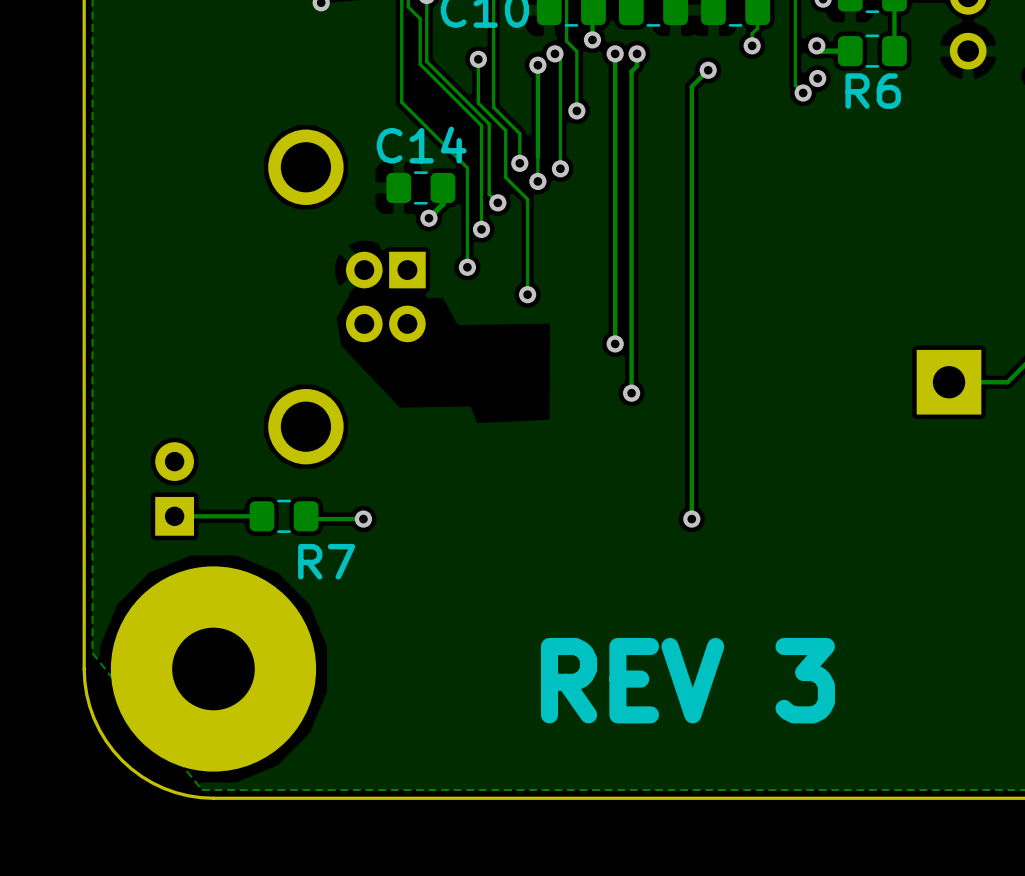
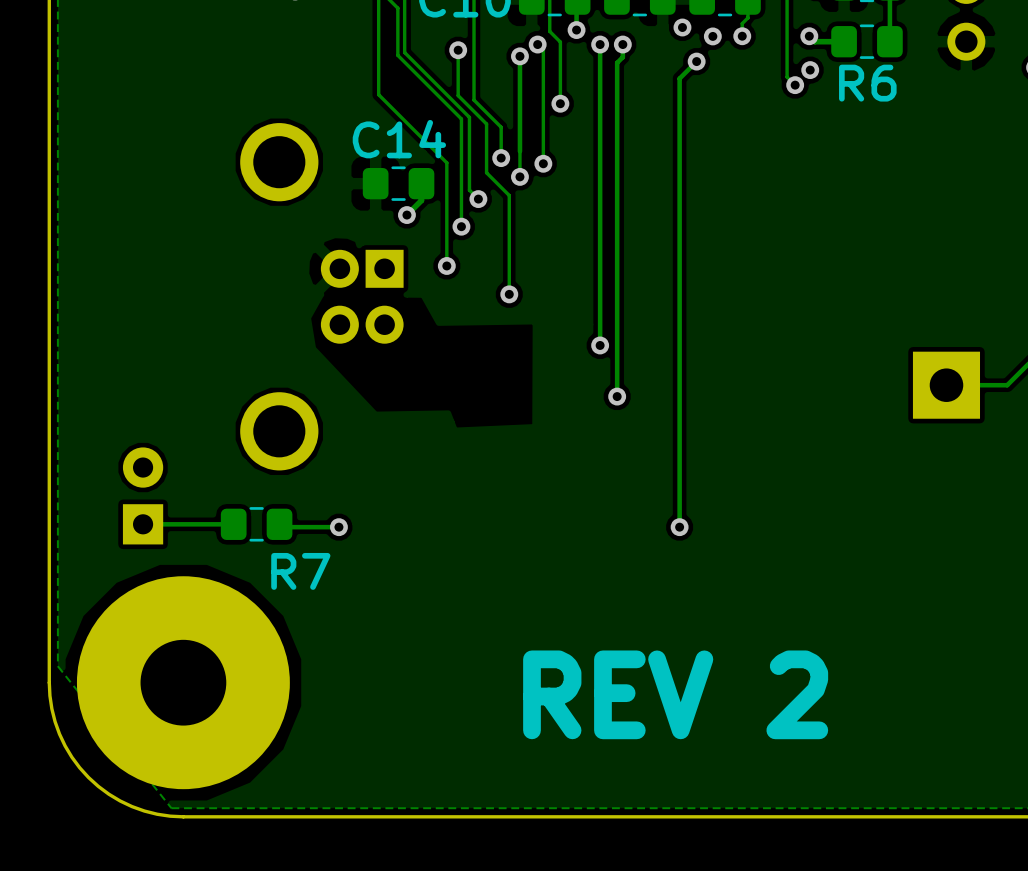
via: none -> (682, 27)
via: none -> (712, 36)
text: REV 3 (687, 680) -> REV 2 (675, 694)

